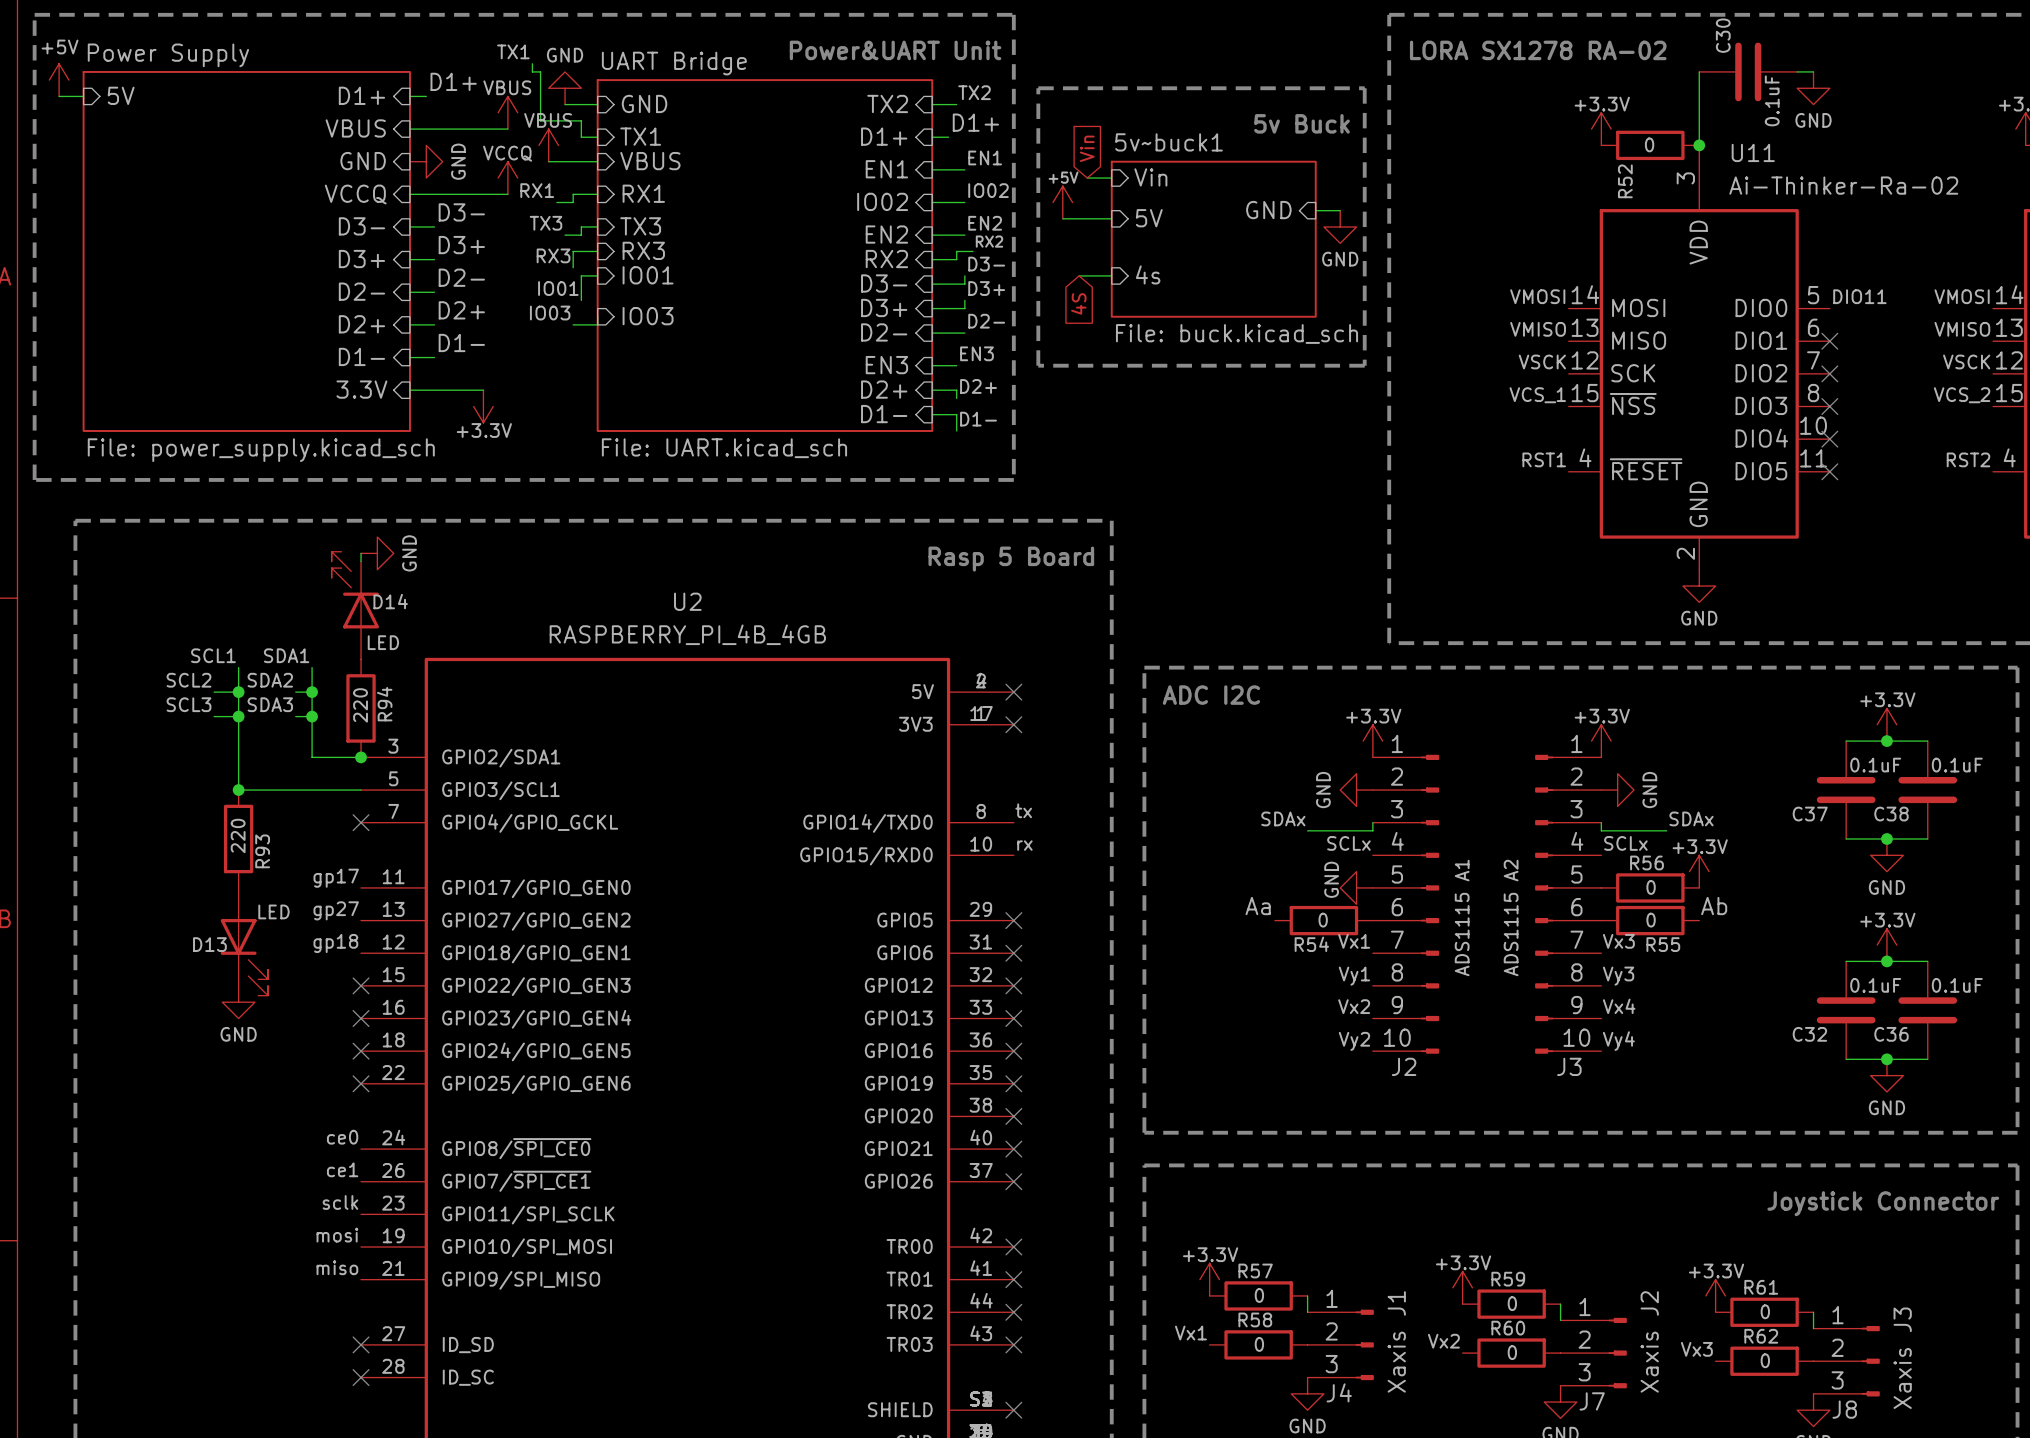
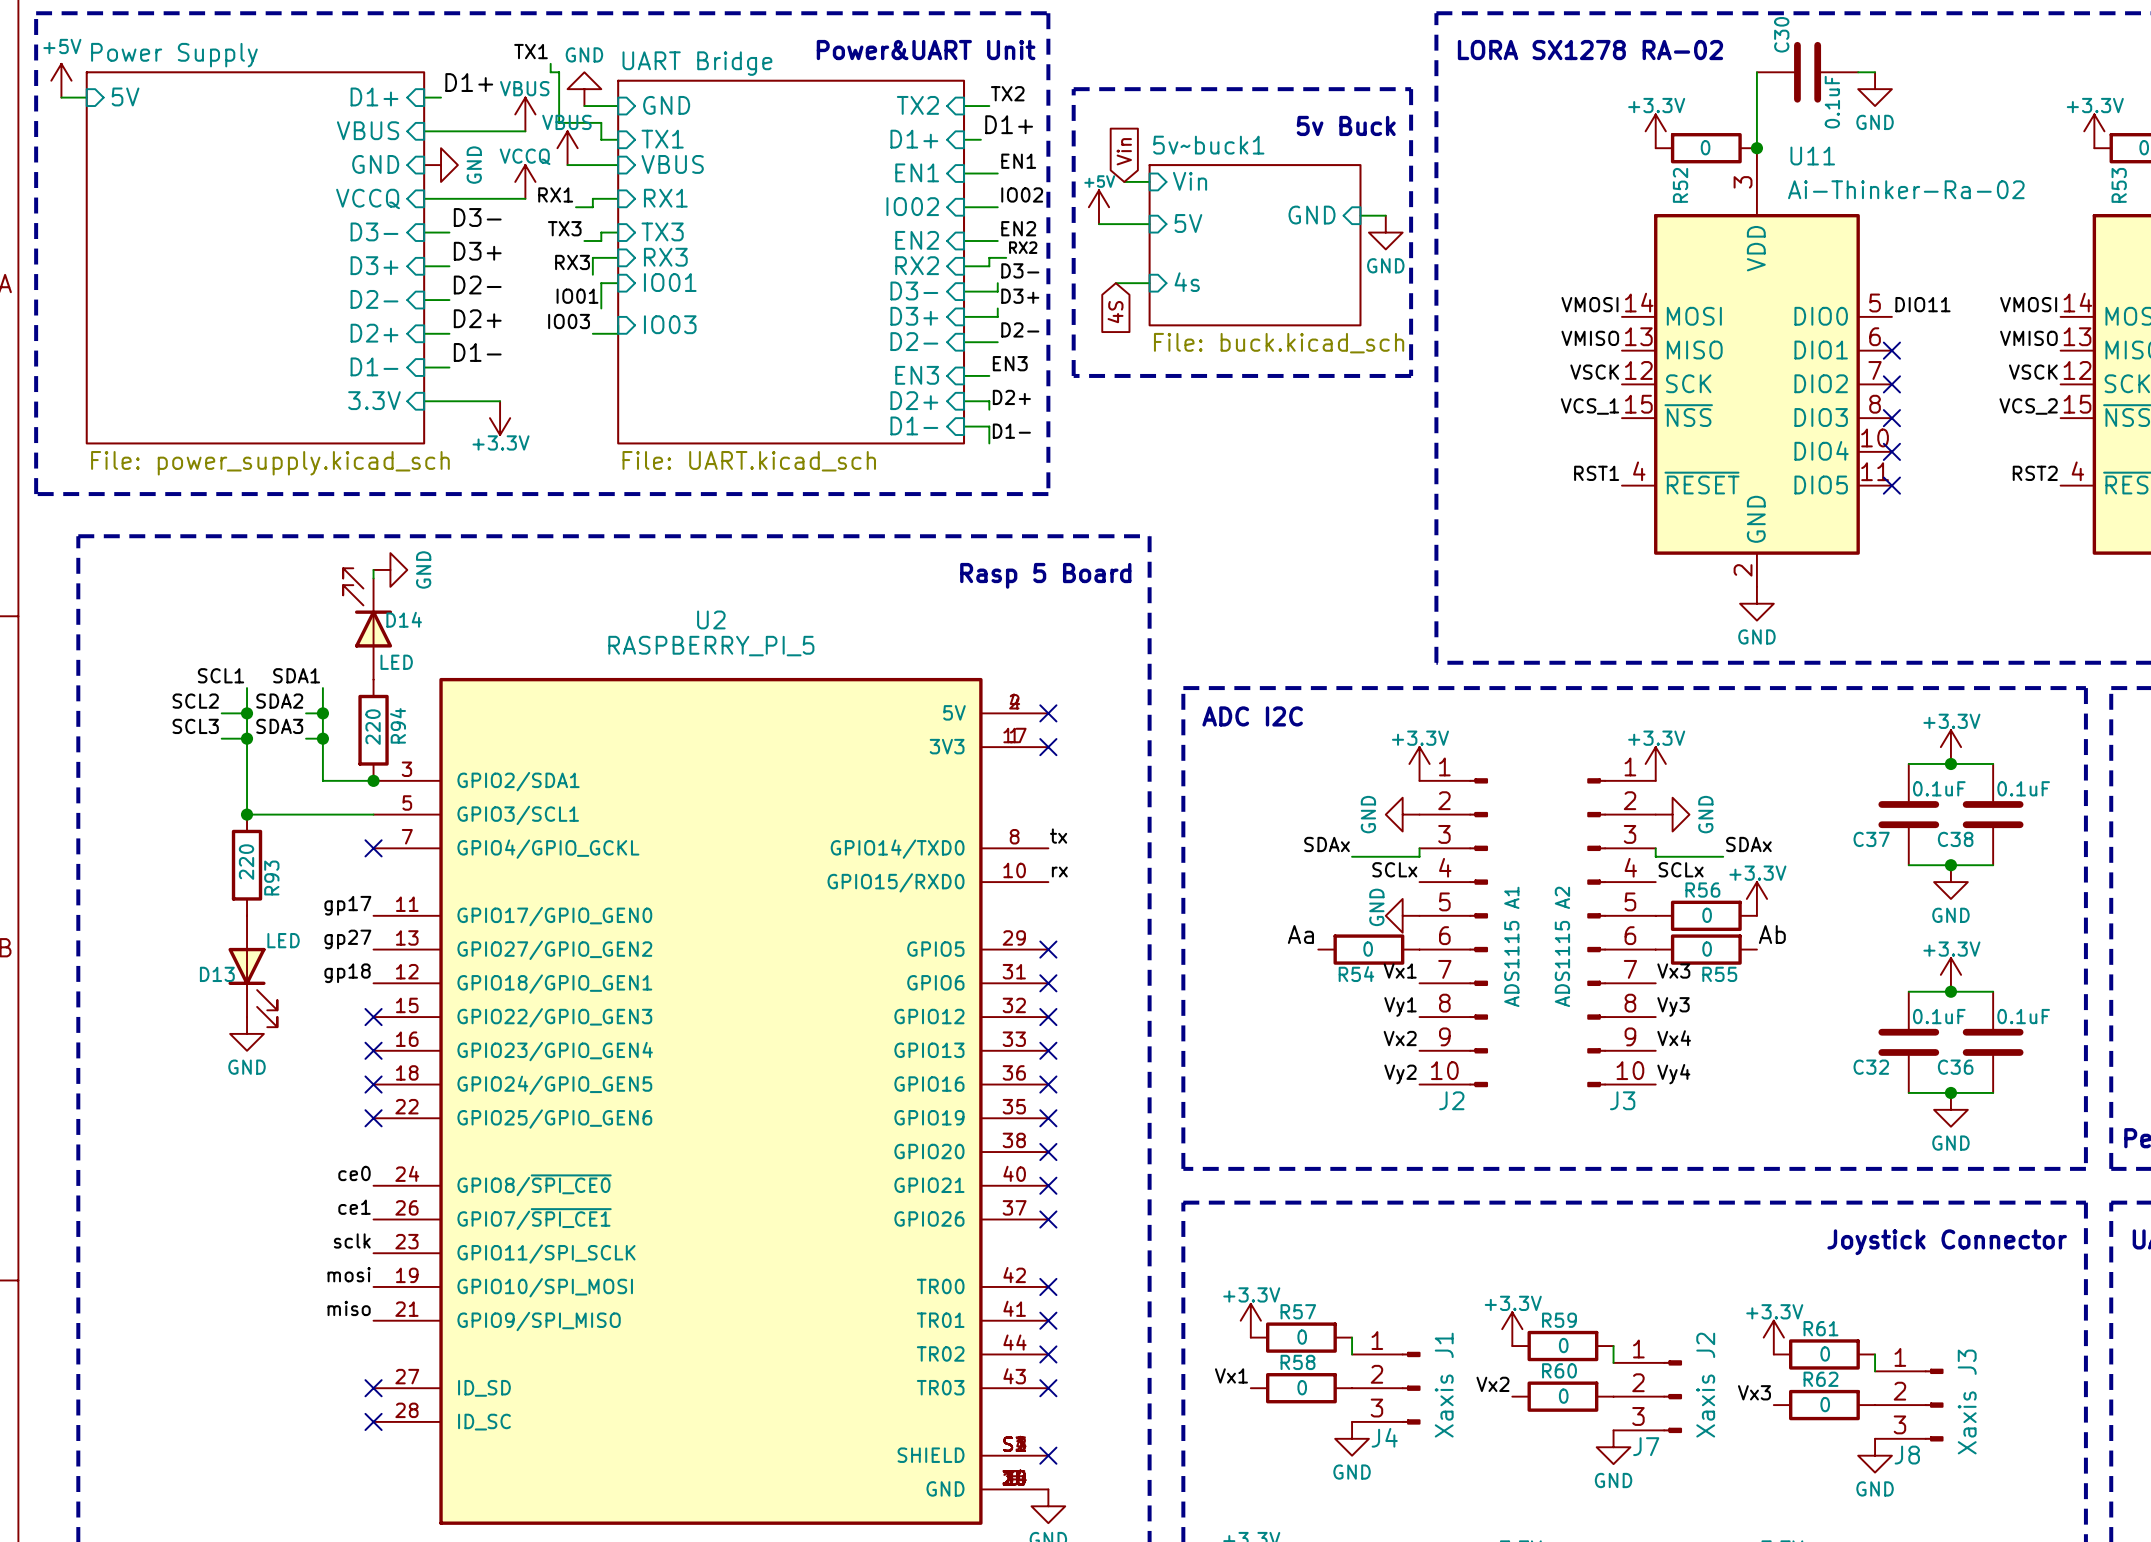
U2 value: RASPBERRY_PI_4B_4GB (687, 634) -> RASPBERRY_PI_5 (711, 646)

